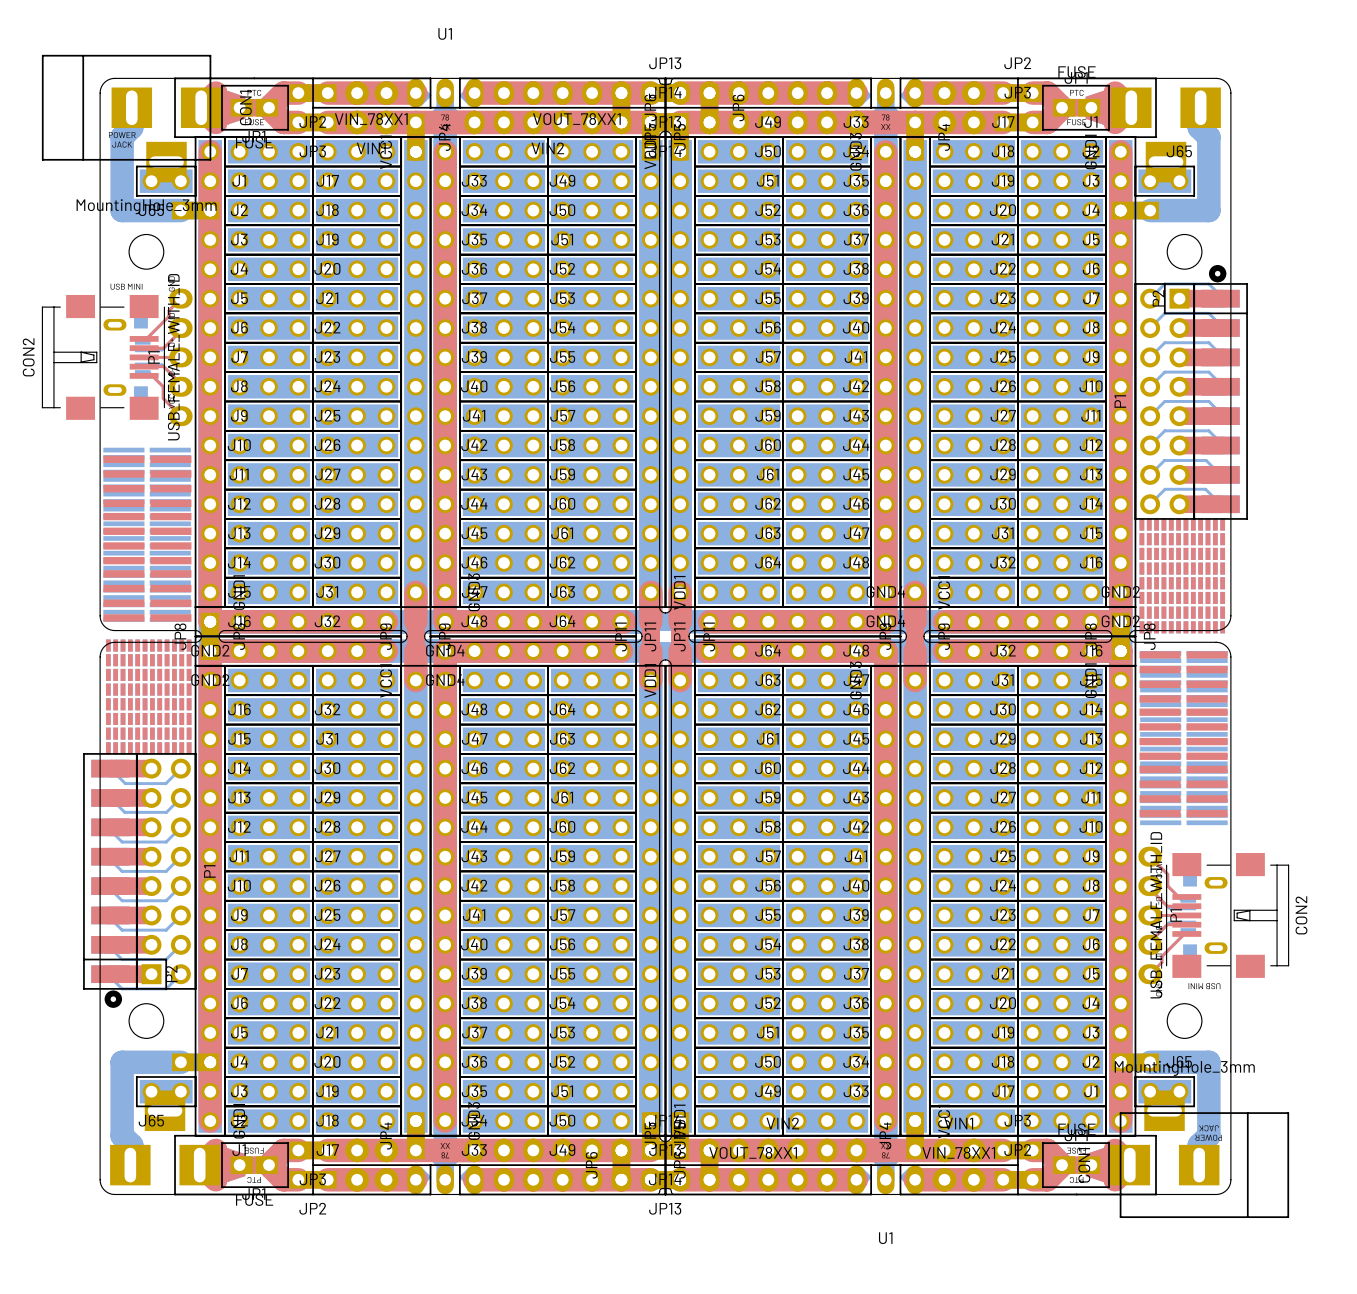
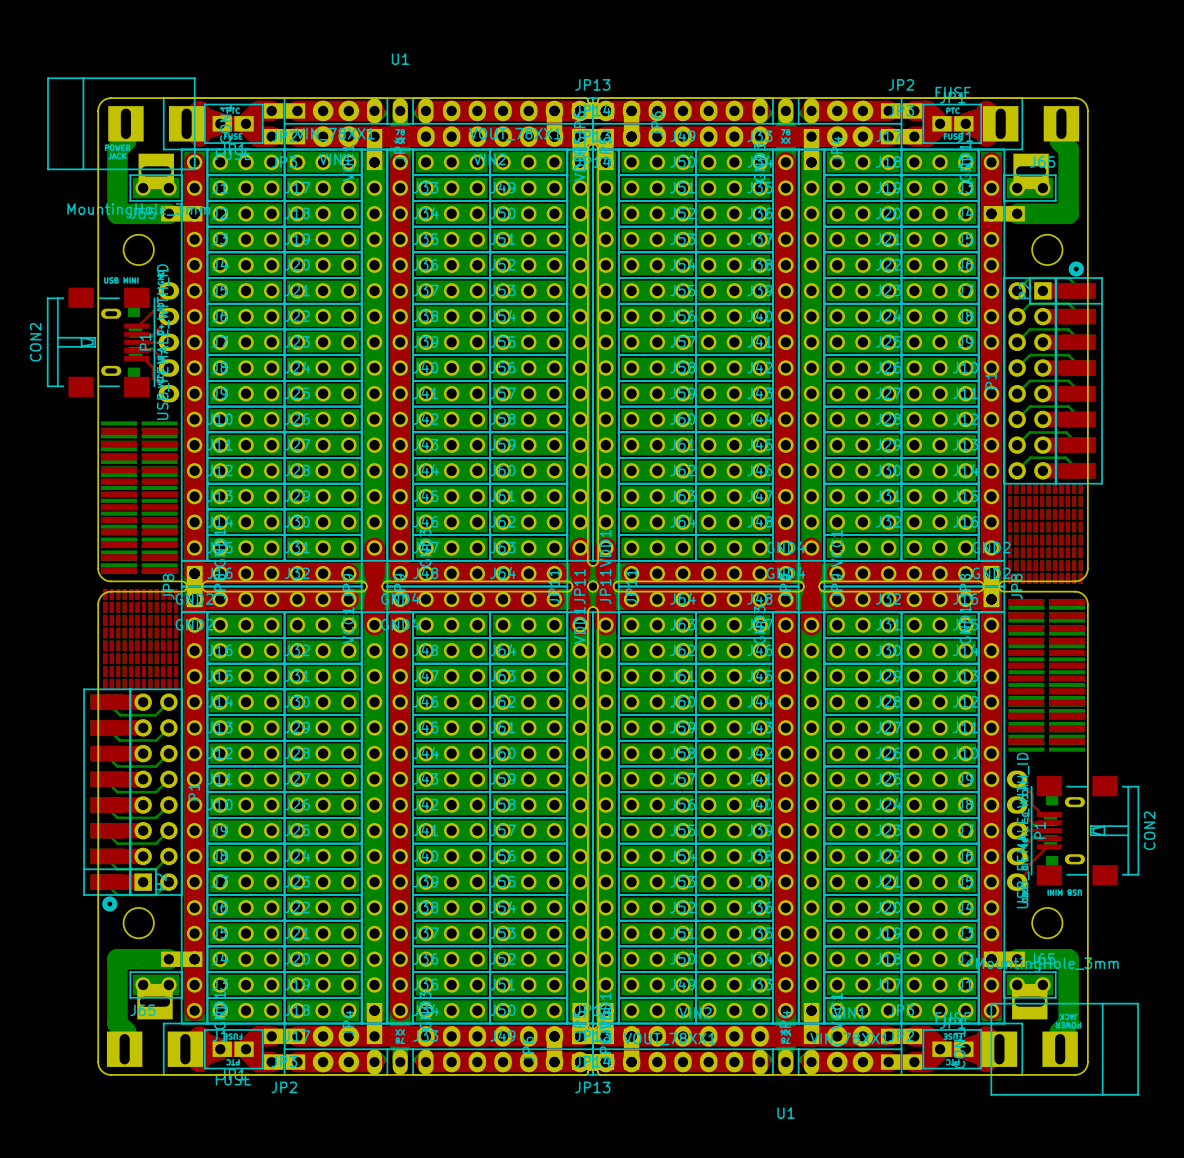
board edge: none -> (593, 581) (596, 582) (598, 586) (596, 590) (593, 591) (589, 590) (587, 586) (589, 582) (593, 581)

